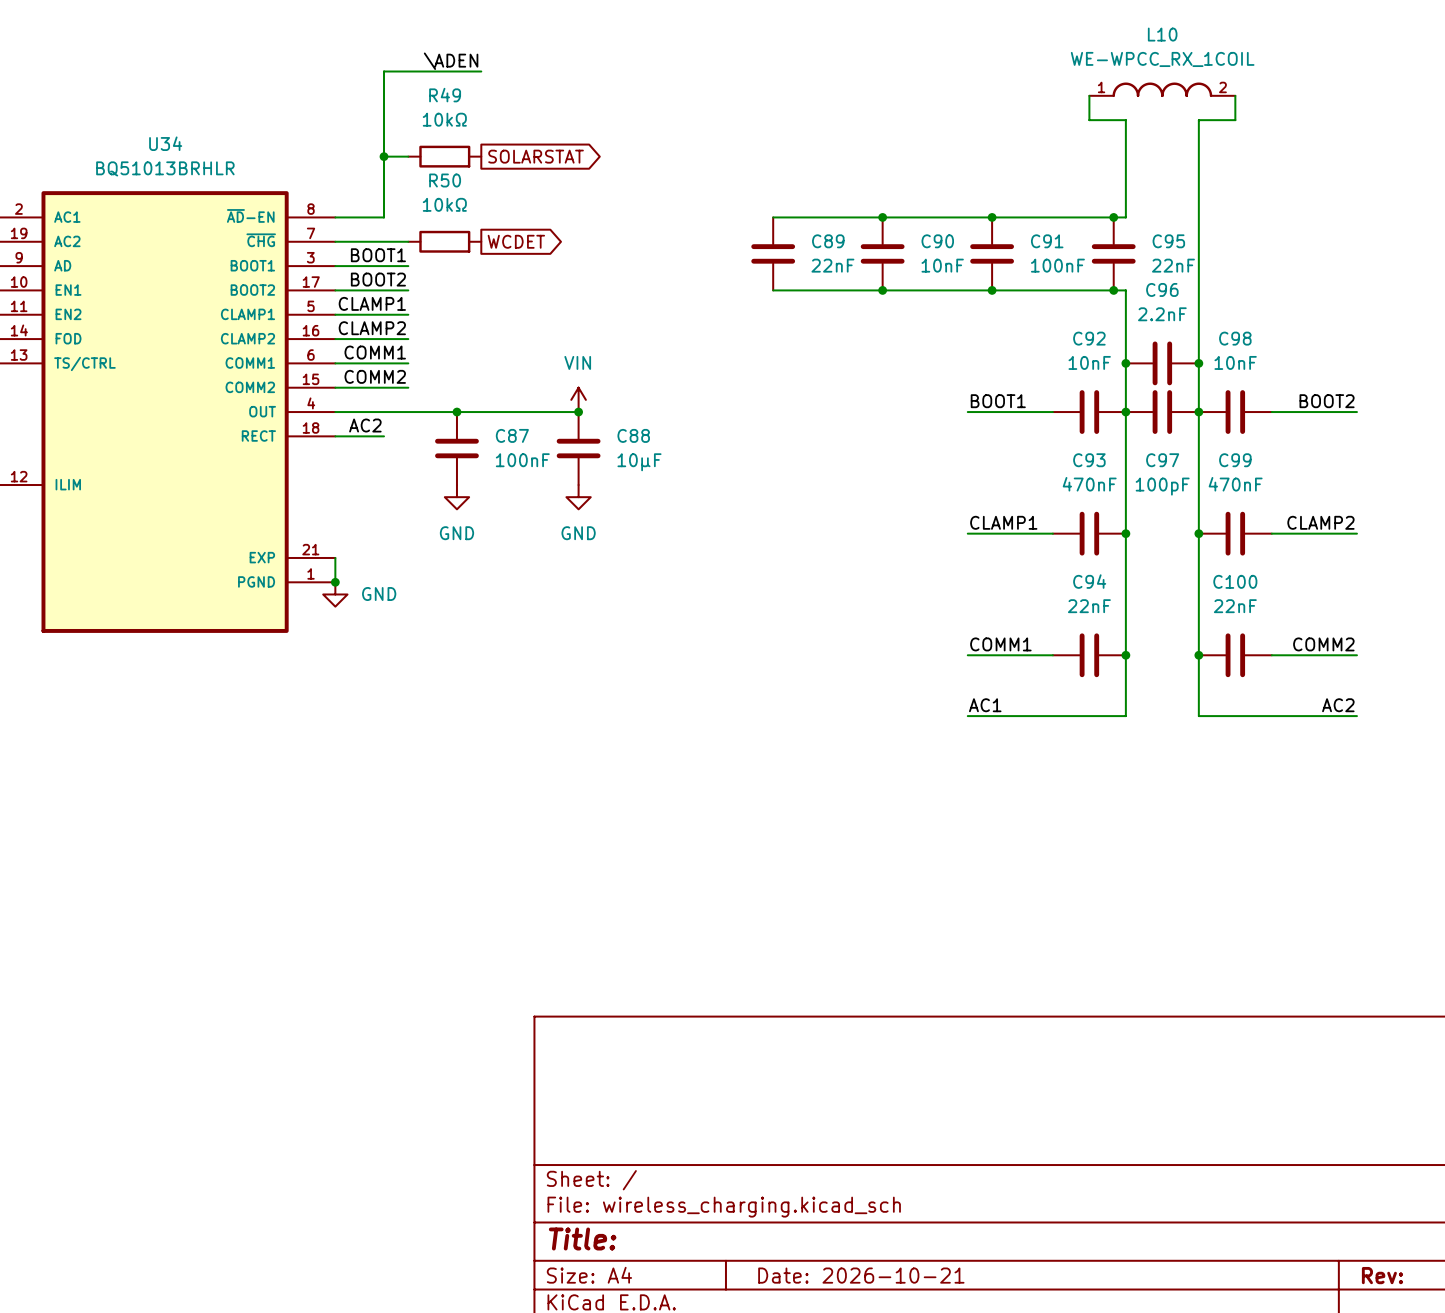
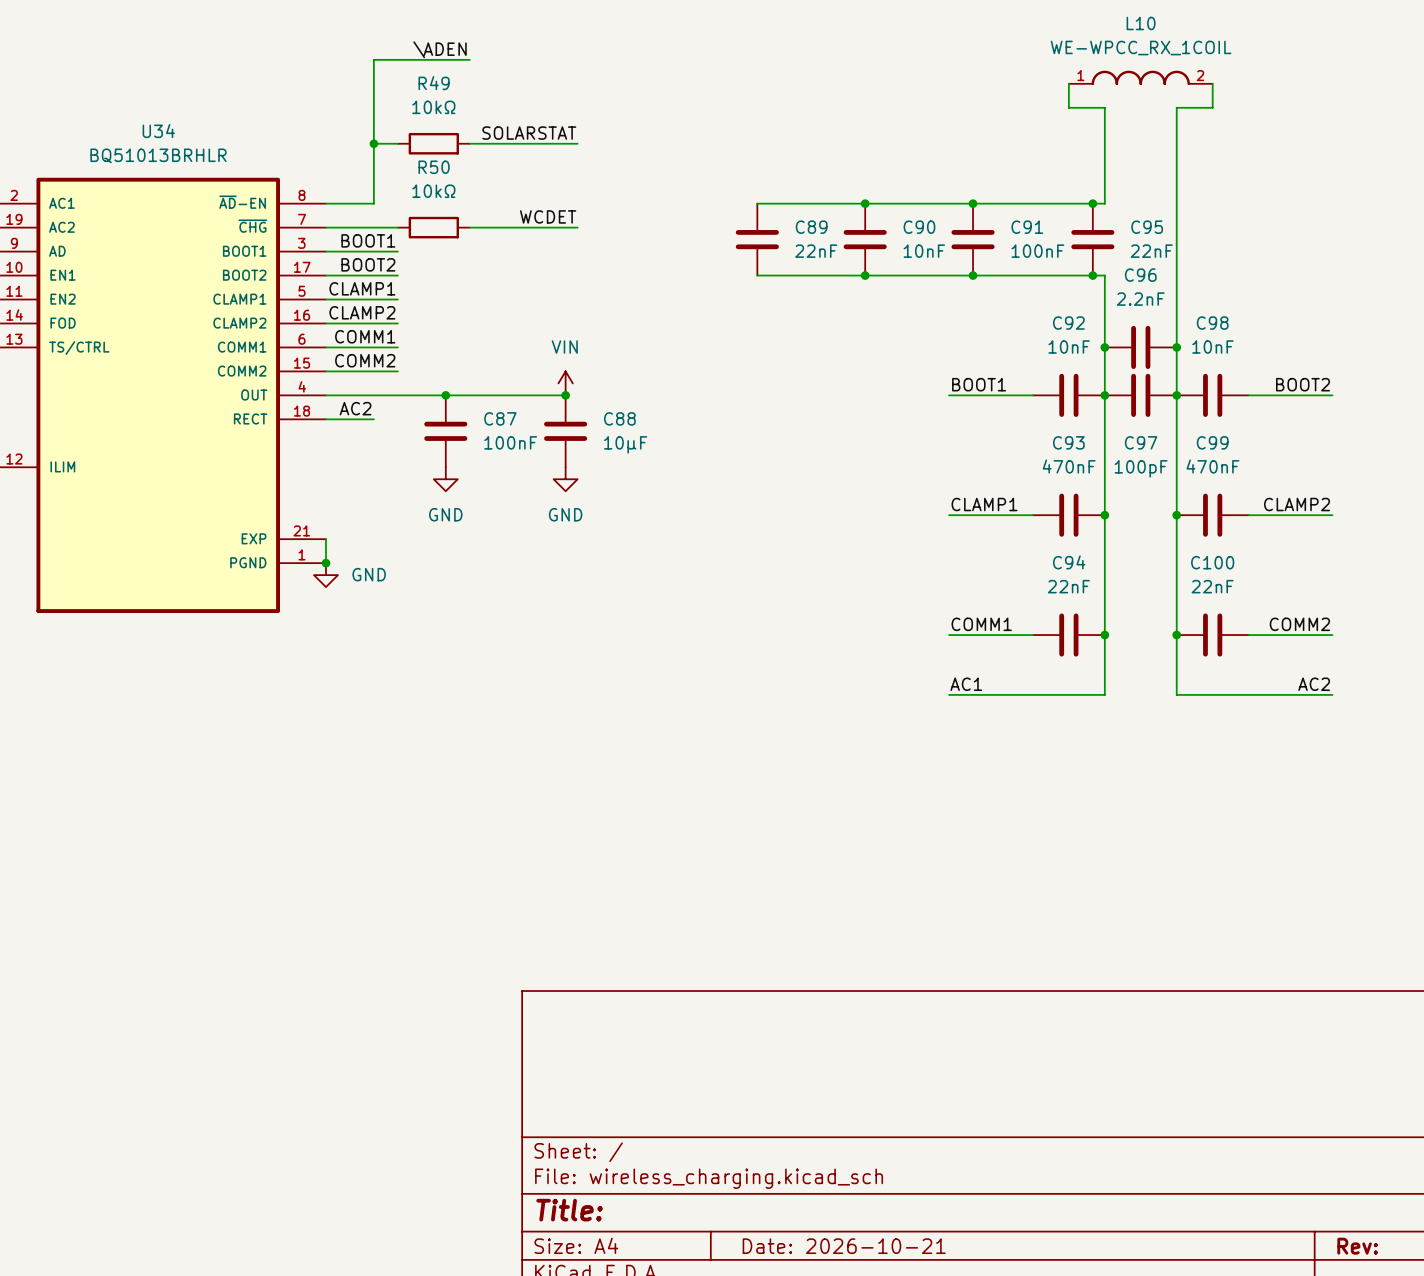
label: none -> SOLARSTAT (529, 133)
wire: none -> (469, 143) (577, 143)
global label: SOLARSTAT (536, 156) -> none
label: none -> WCDET (548, 216)
wire: none -> (469, 227) (577, 227)
global label: WCDET (516, 241) -> none

